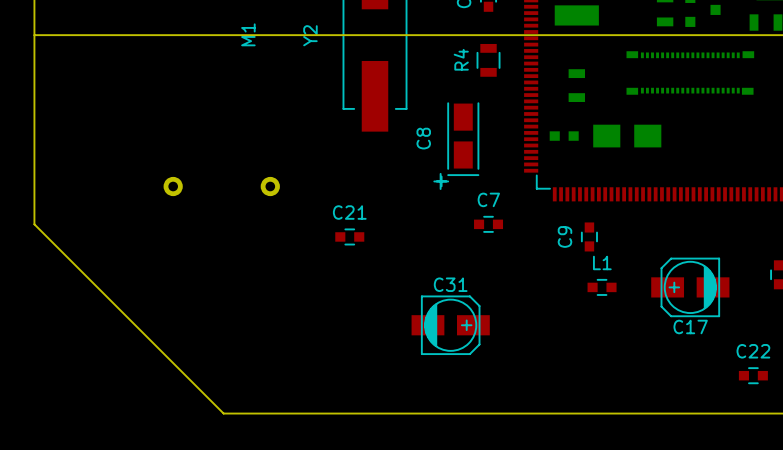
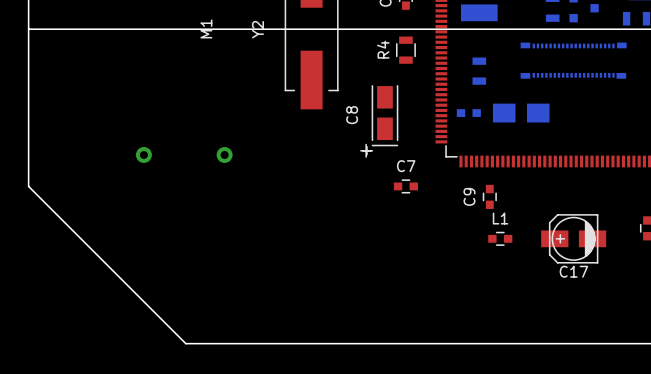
C21: (349, 236) -> none
C31: (450, 325) -> none
C22: (753, 375) -> none

